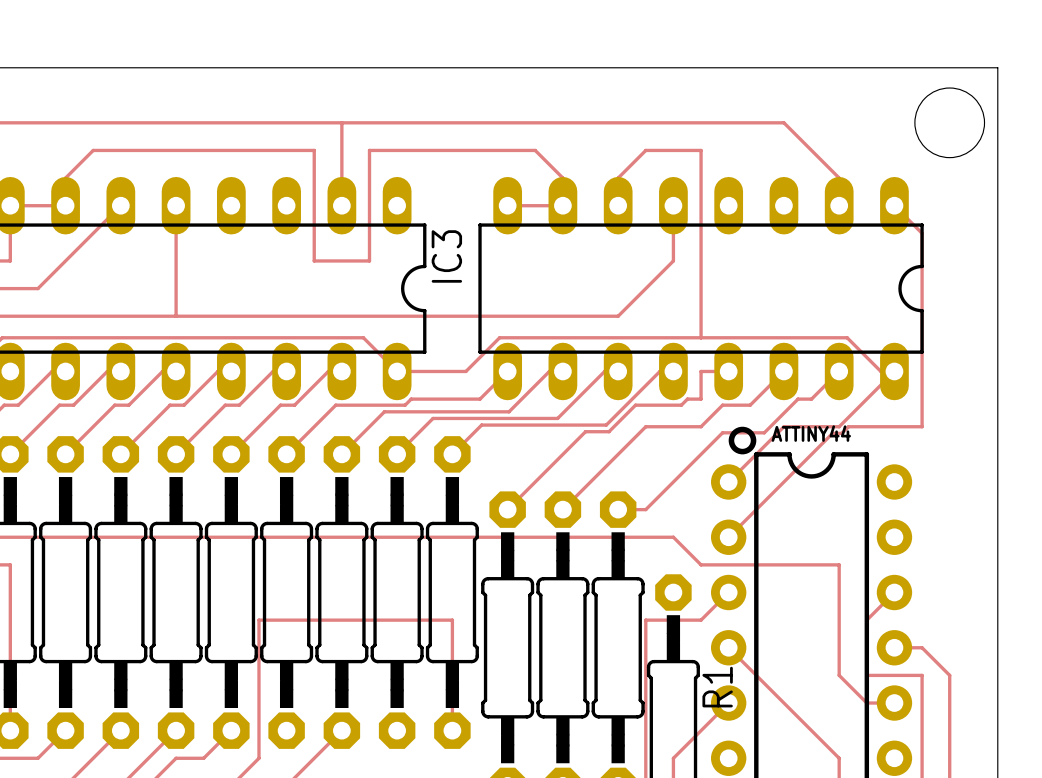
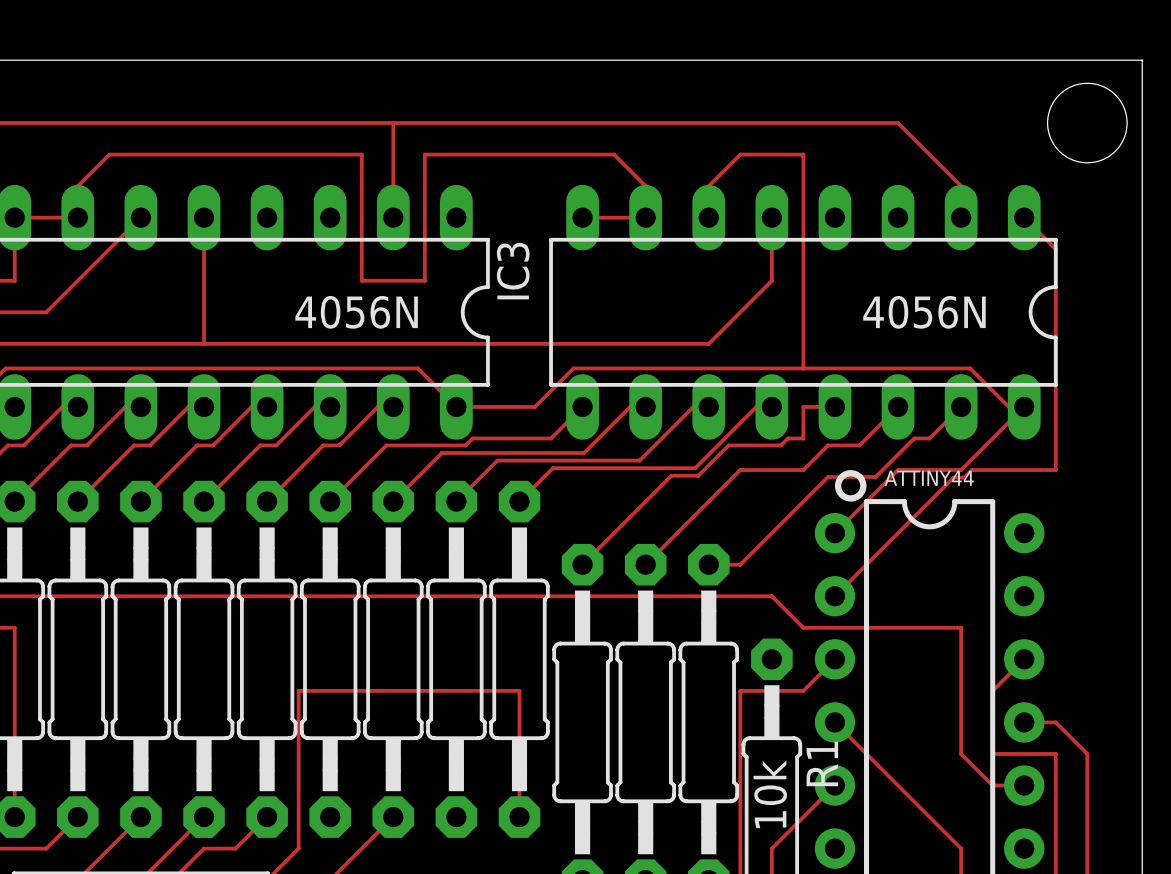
IC3 value: none -> 4056N (356, 312)
part value: none -> 4056N (924, 312)
R1 value: none -> 10k (770, 794)

